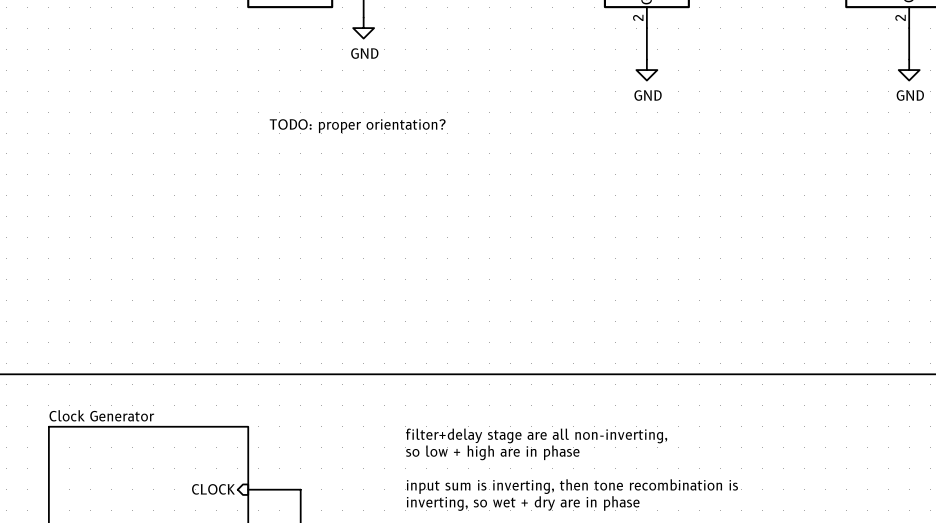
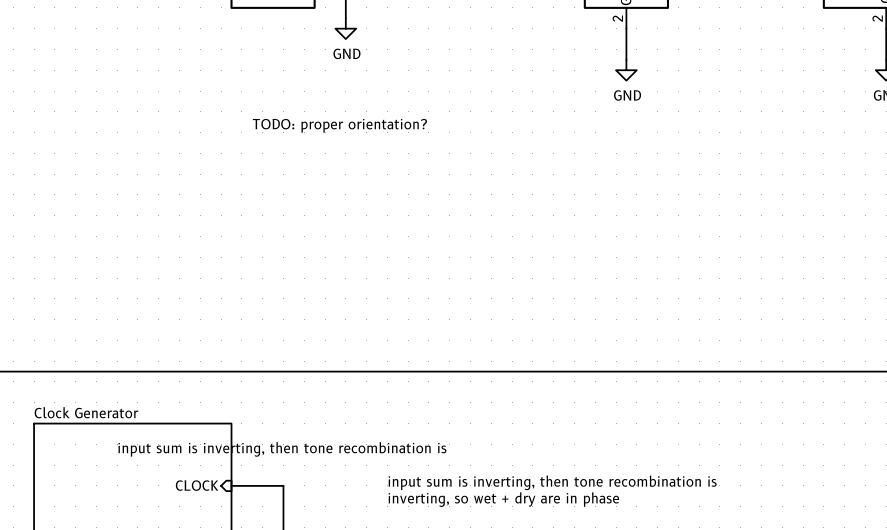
text: filter+delay stage are all non-inverting, (536, 435) -> none
text: none -> input sum is inverting, then tone recombination is (282, 449)
text: so low + high are in phase (492, 452) -> none

